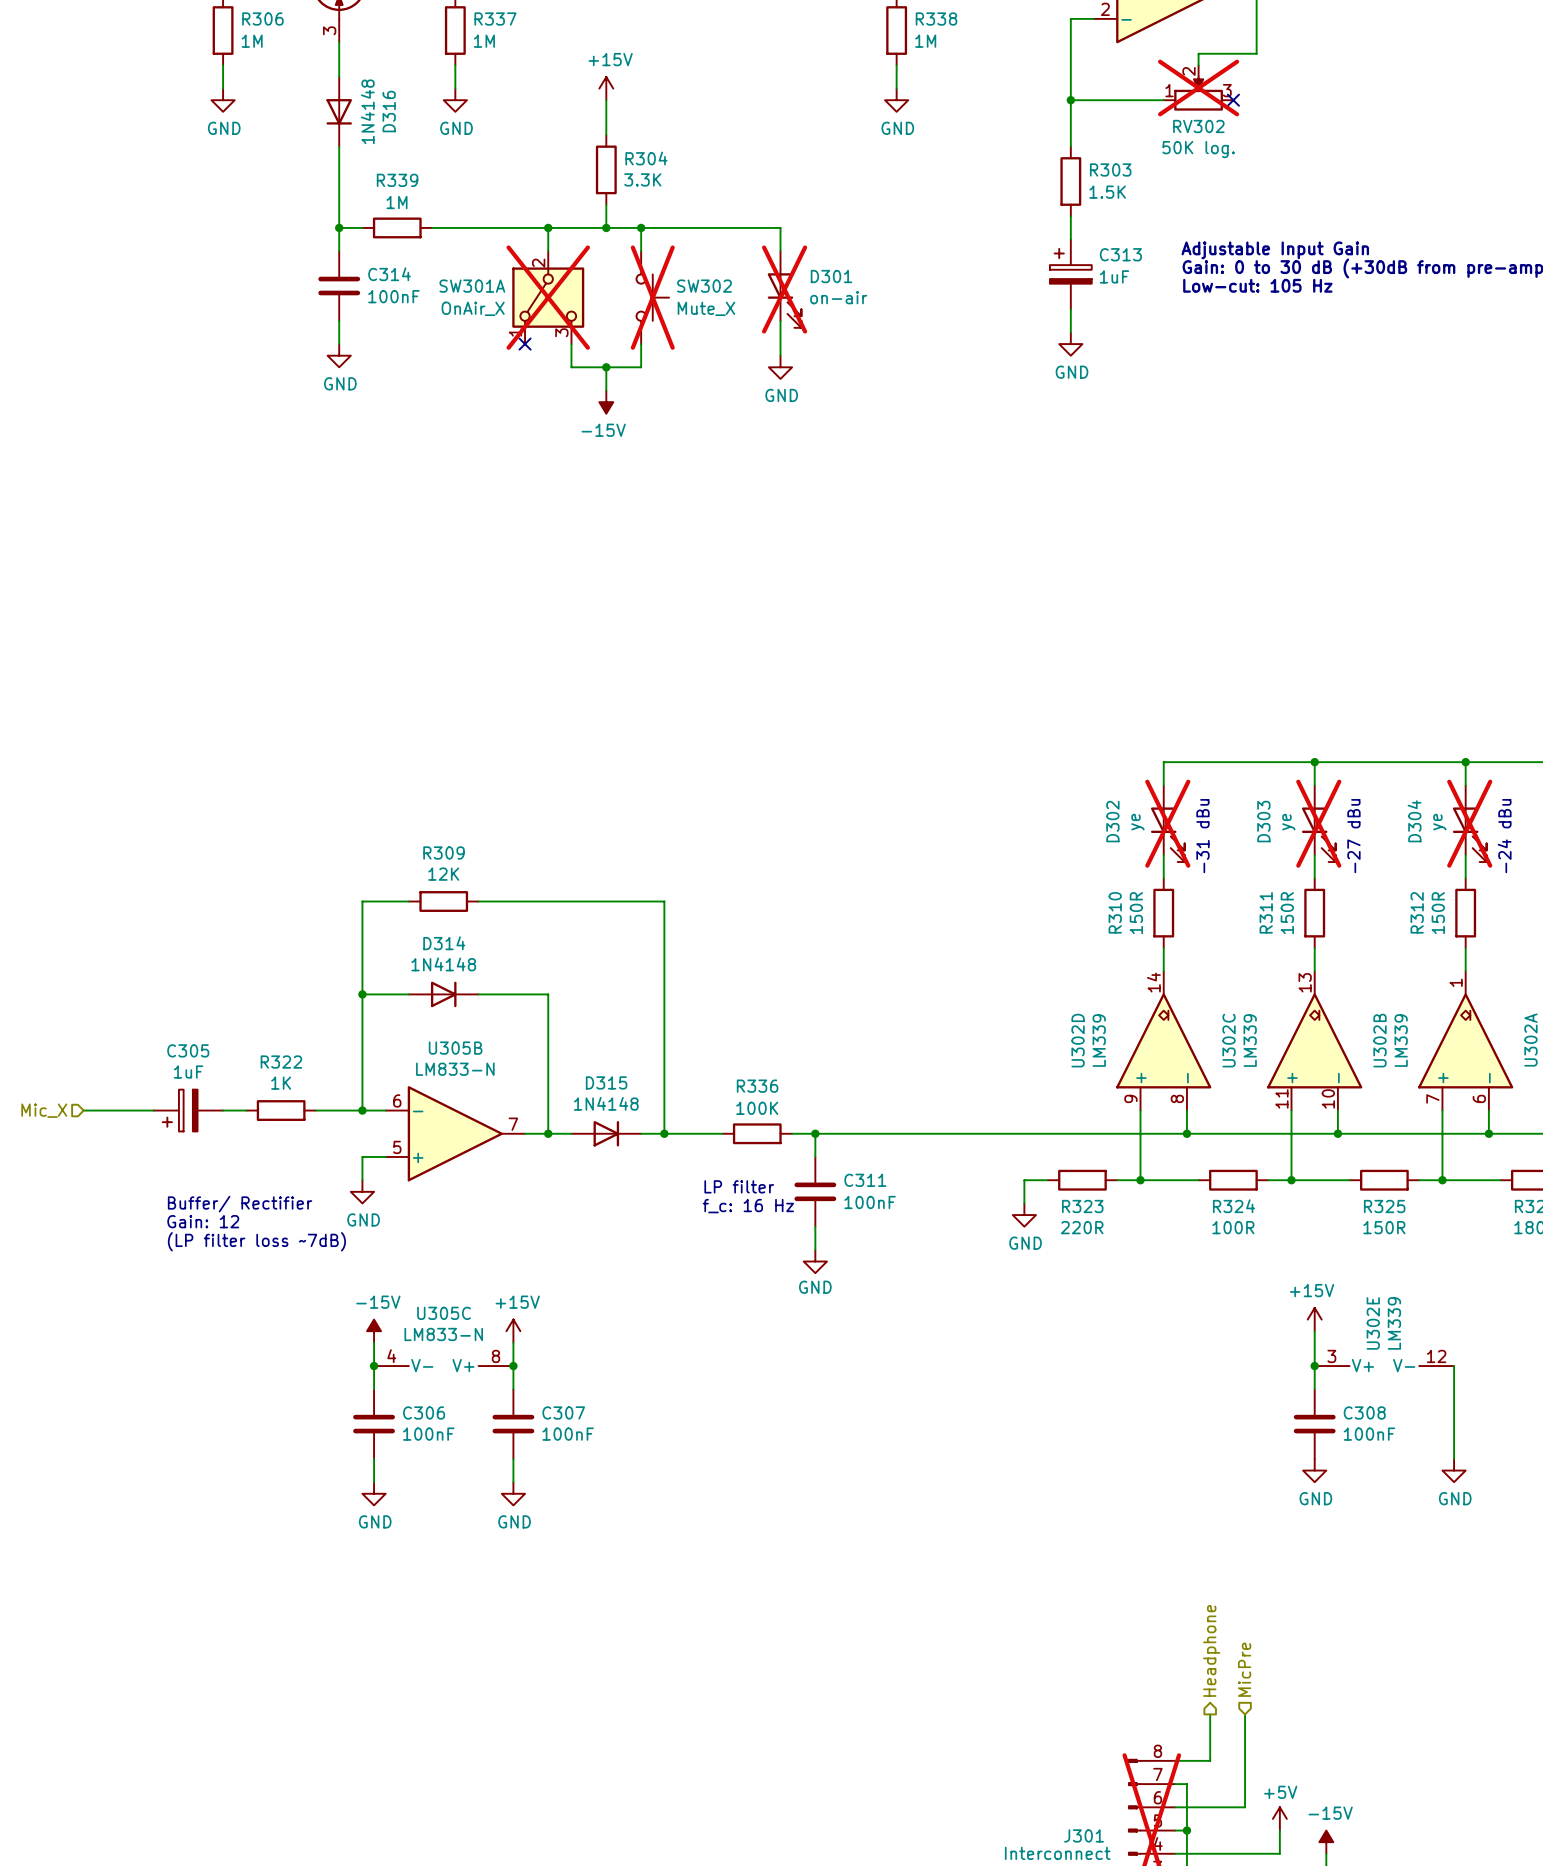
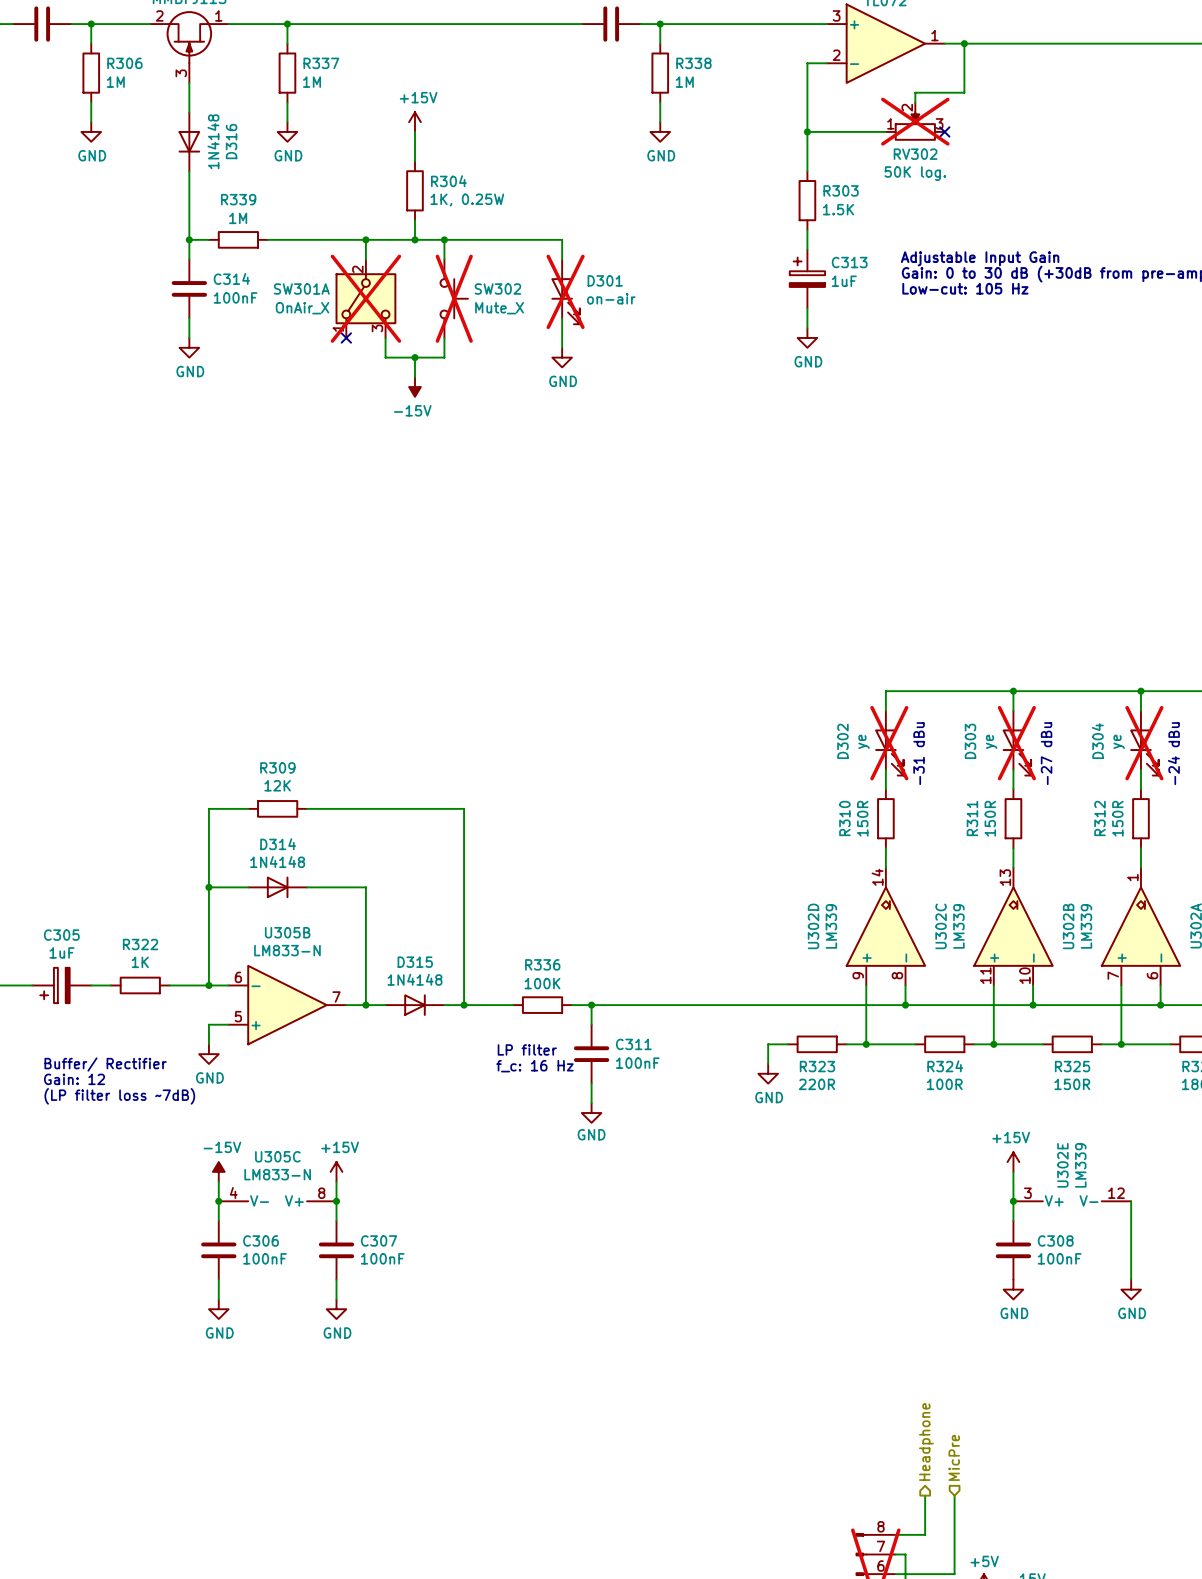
R304 value: 3.3K (642, 179) -> 1K, 0.25W (467, 199)

